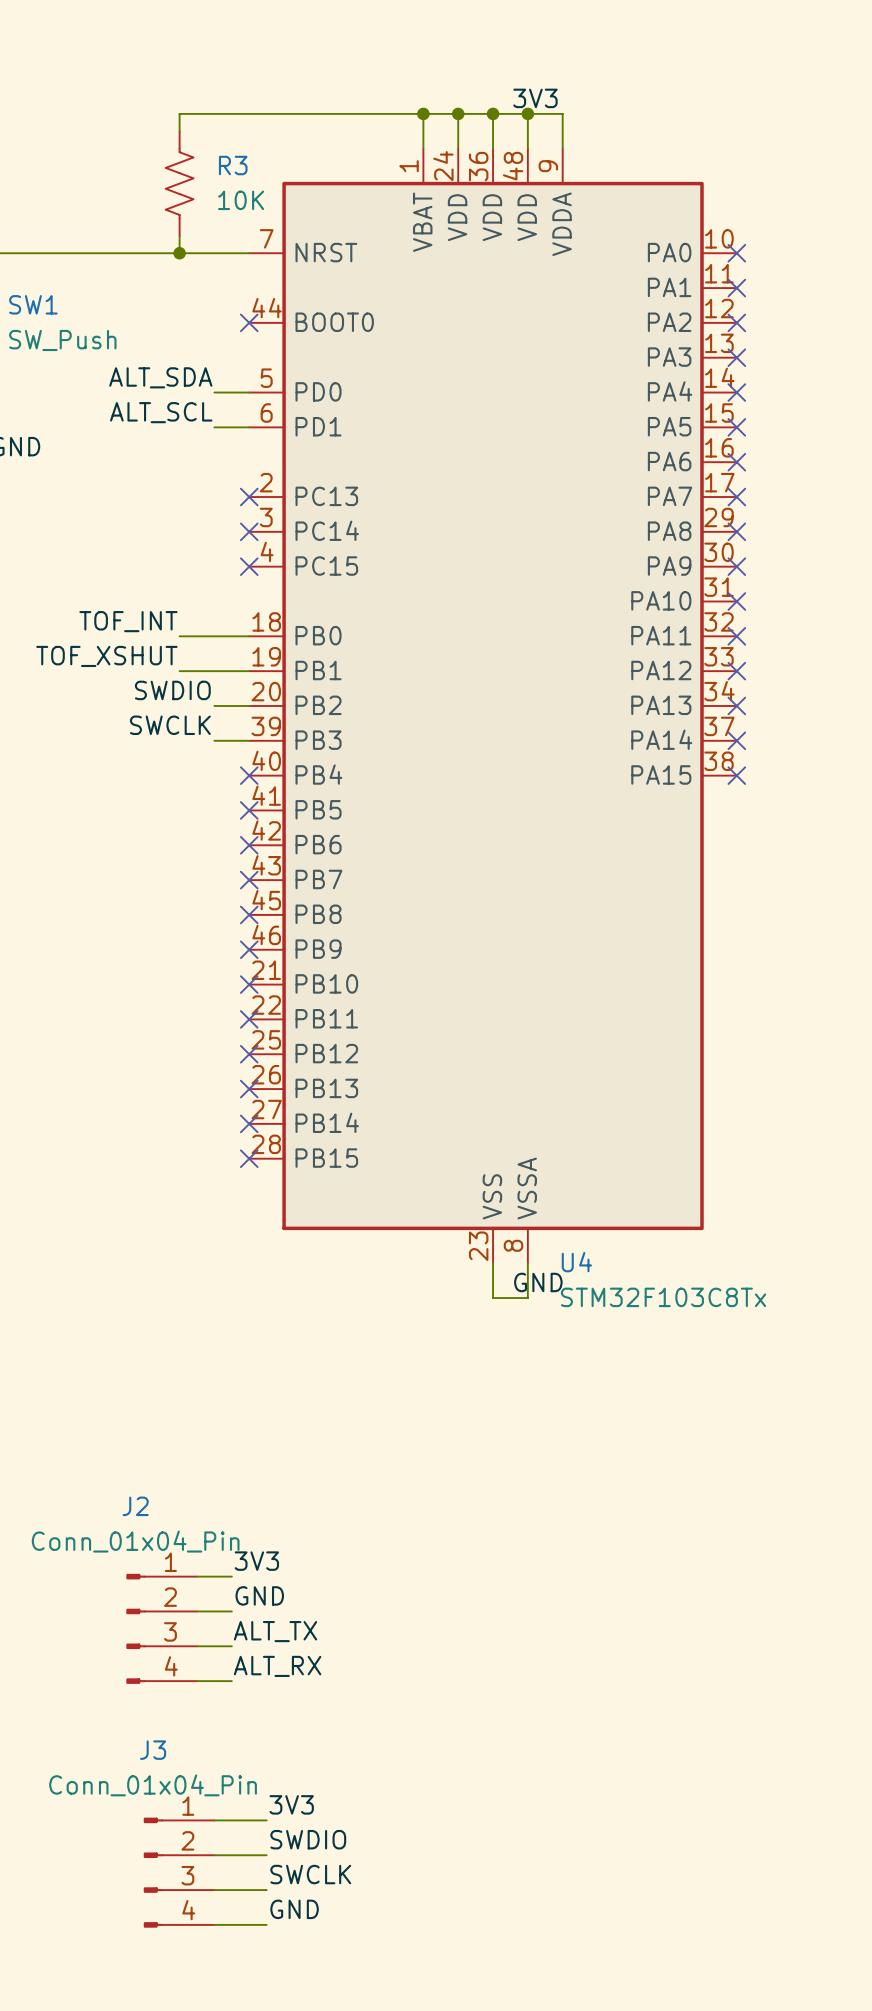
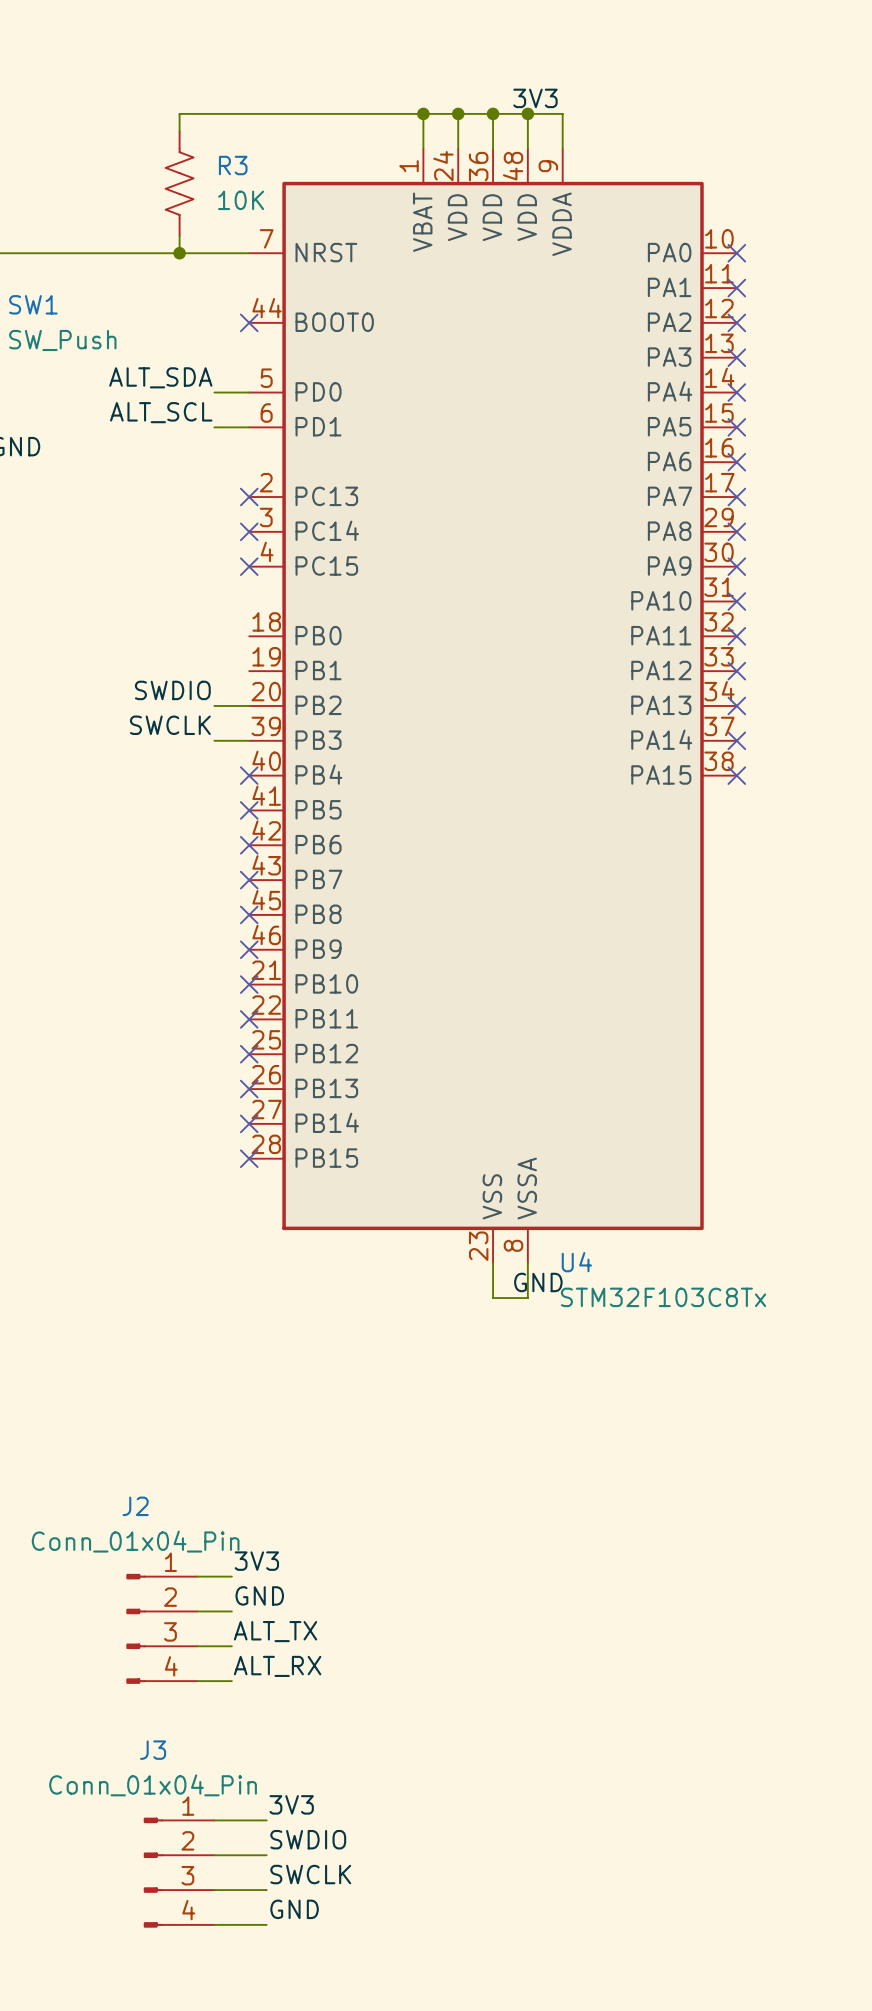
label: TOF_INT (128, 621) -> none
wire: (179, 636) (249, 636) -> none
label: TOF_XSHUT (106, 656) -> none
wire: (179, 671) (249, 671) -> none

